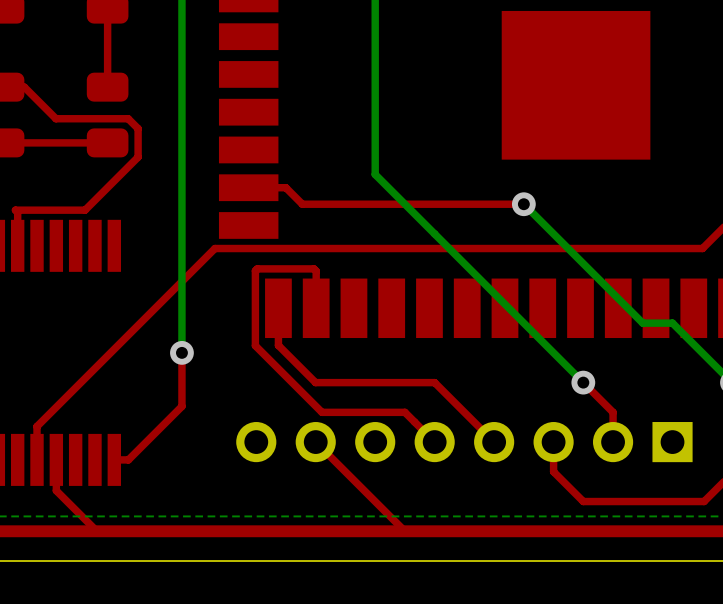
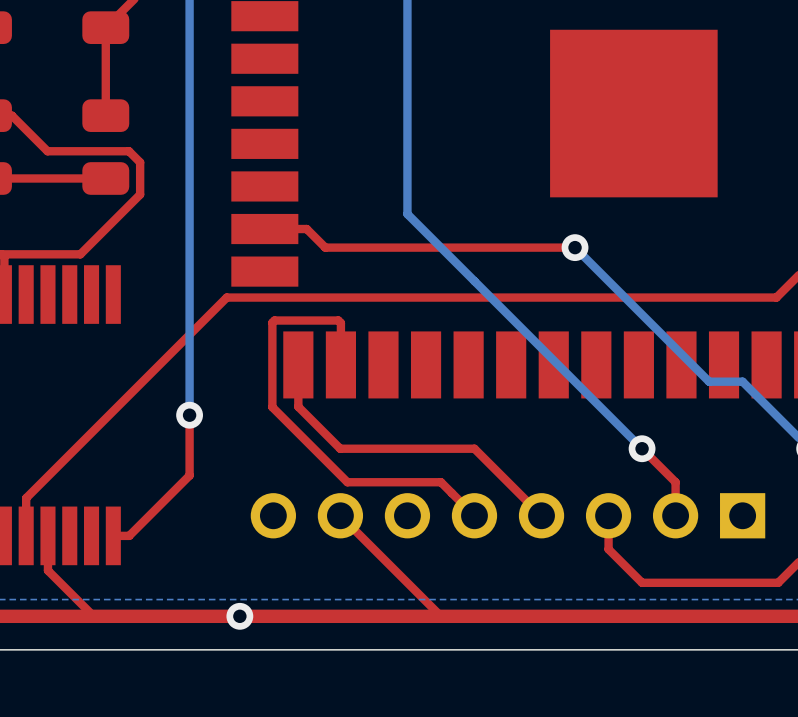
via: none -> (239, 616)

